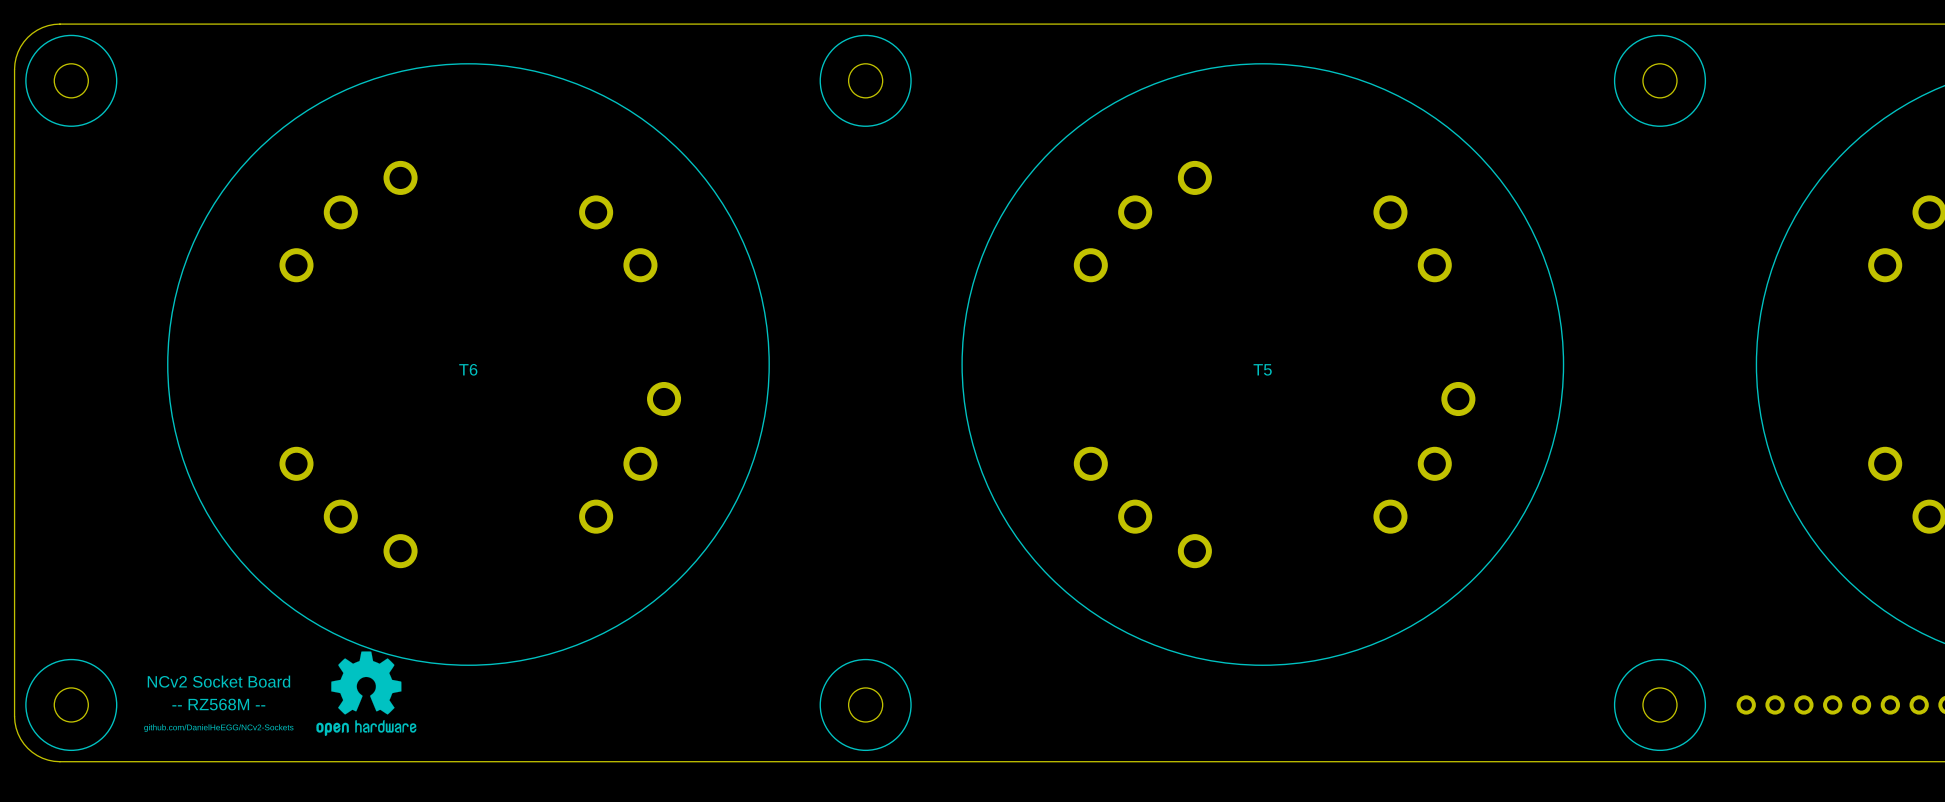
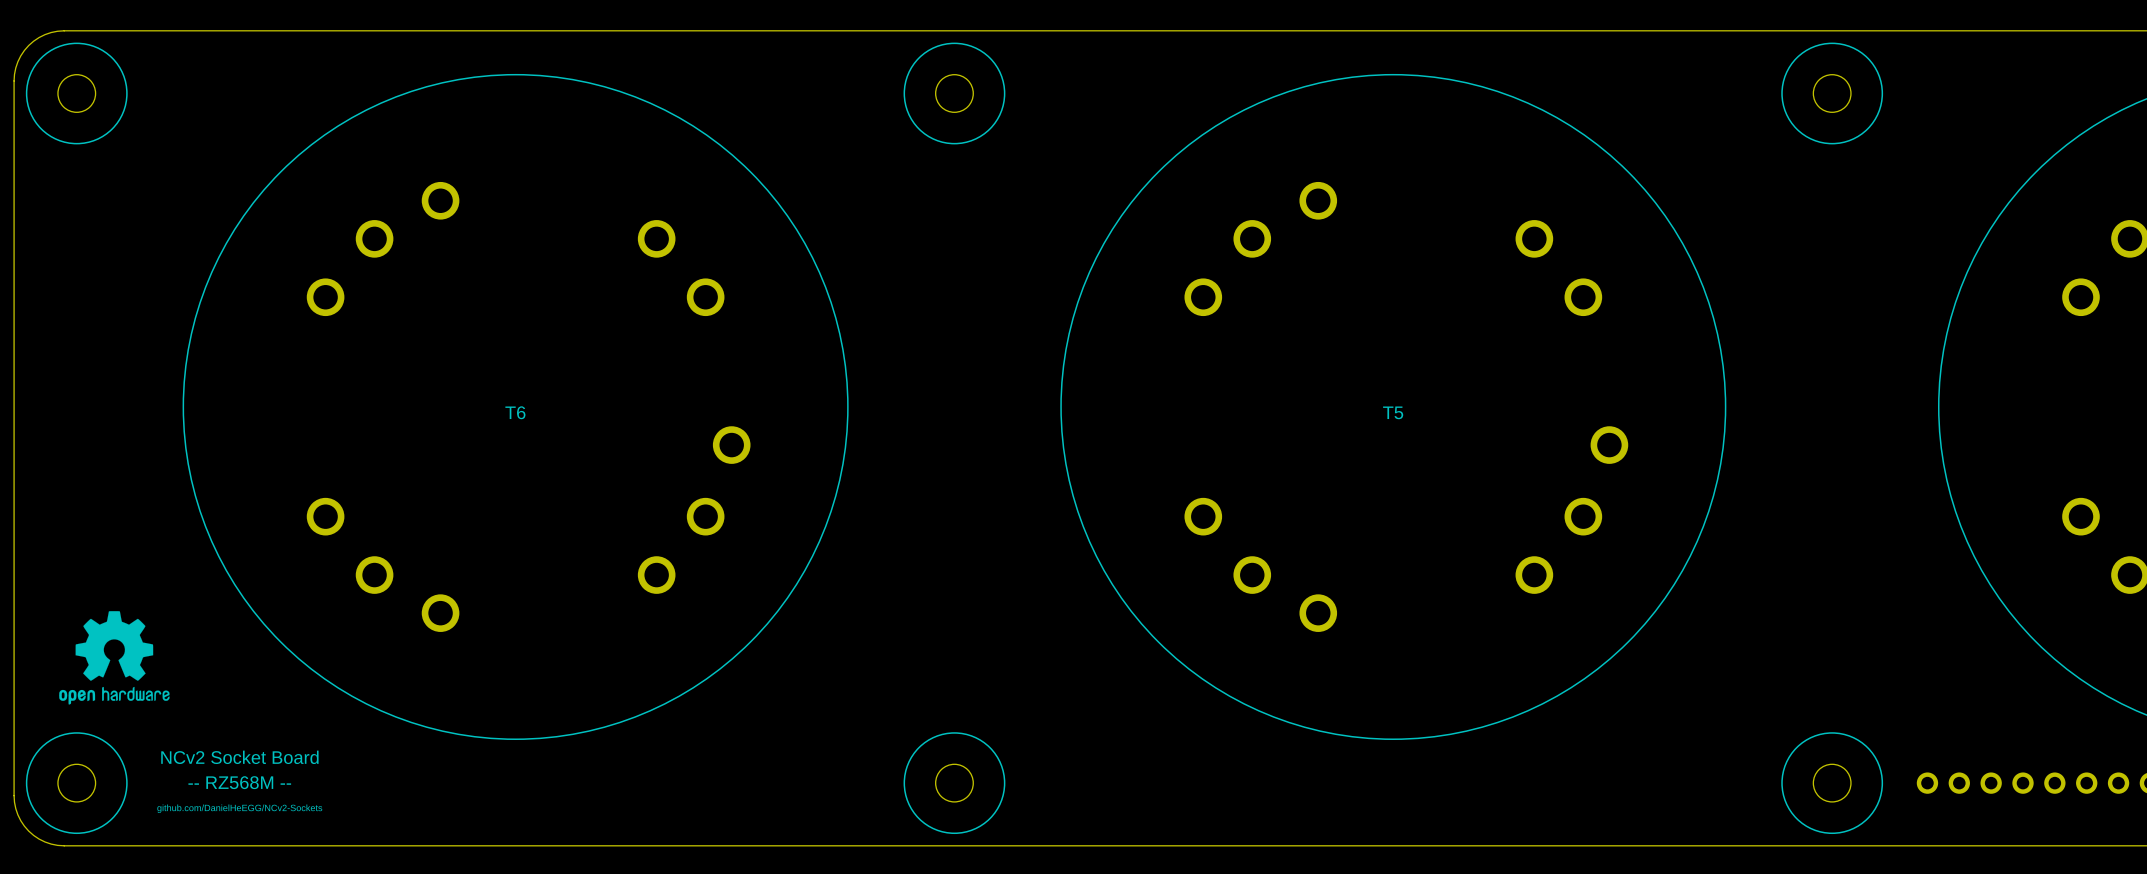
drawing position: (366, 693) -> (114, 657)

